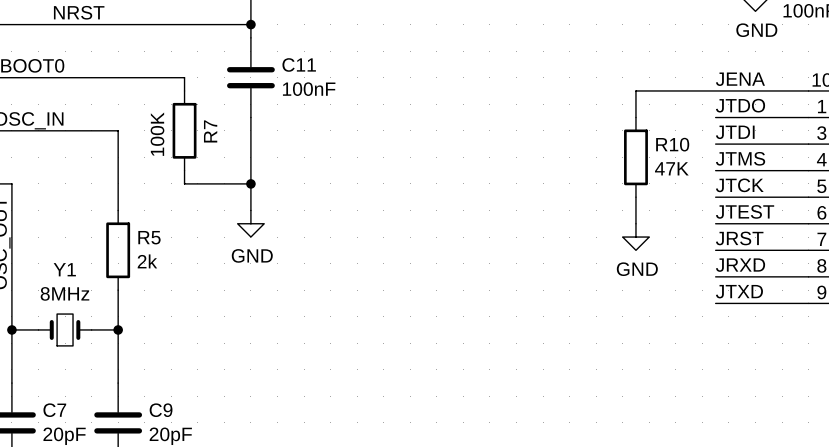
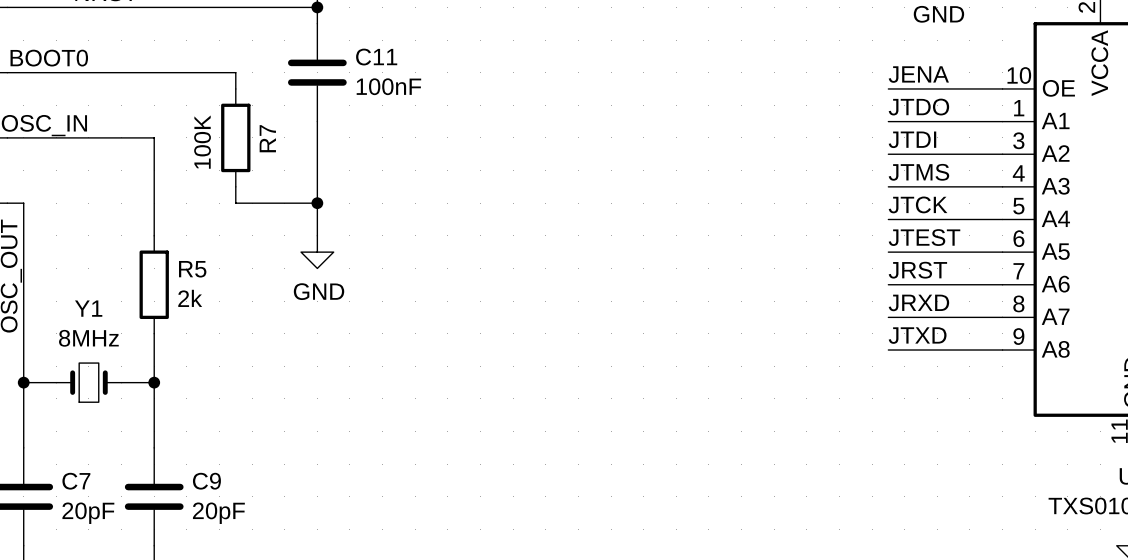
wire: (715, 90) (635, 90) (635, 117) -> none
R10: 47K (635, 157) -> none
wire: (635, 197) (635, 223) -> none
power symbol: GND (635, 237) -> none

